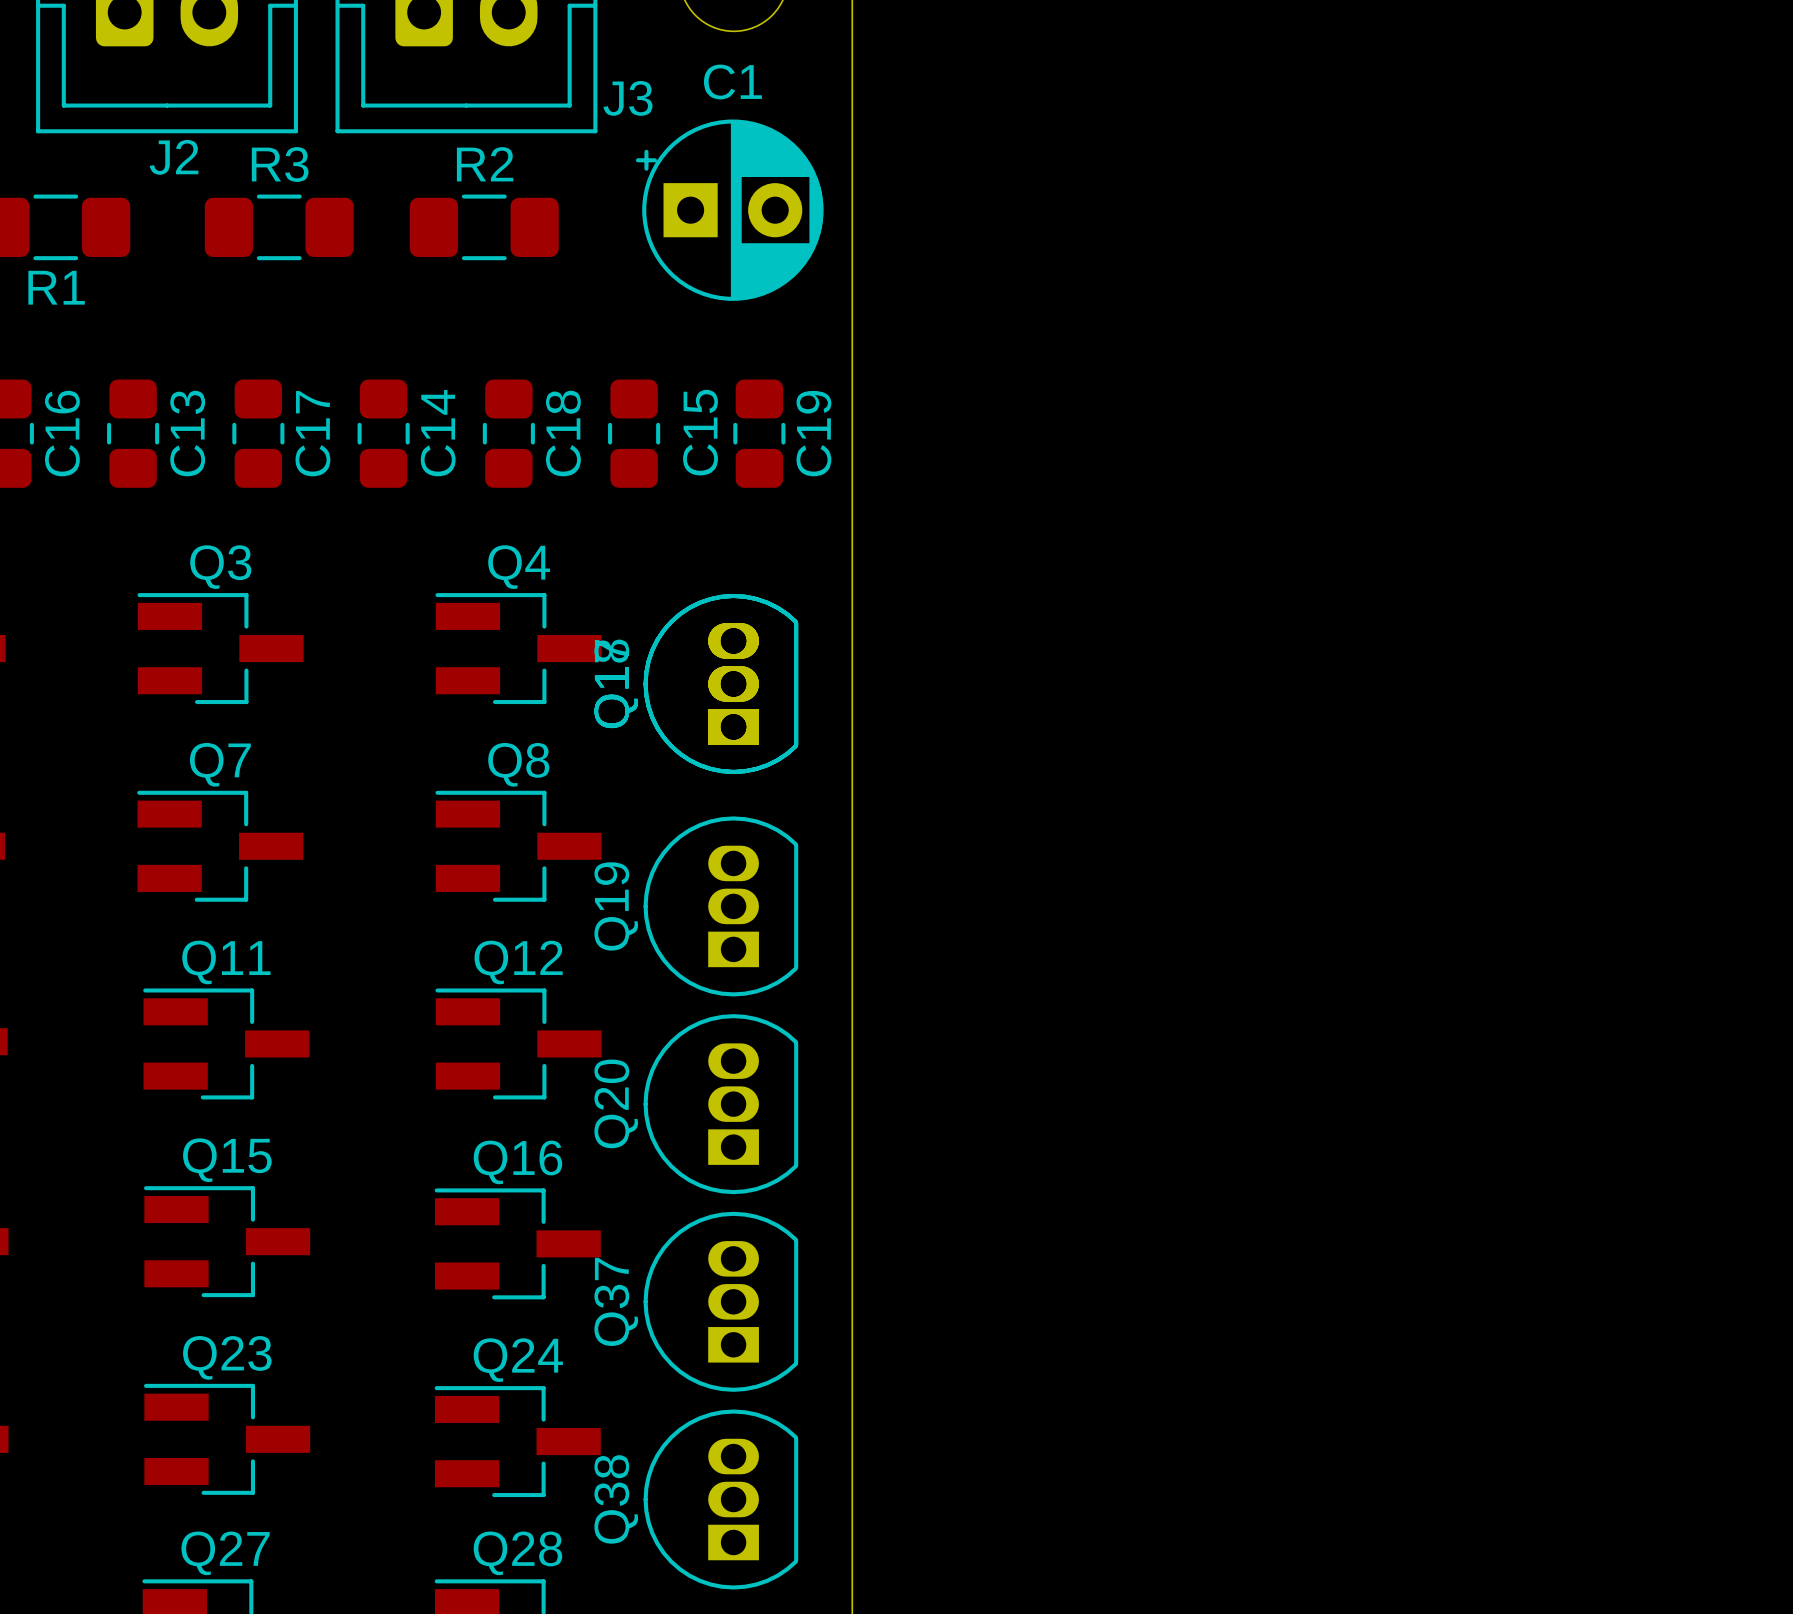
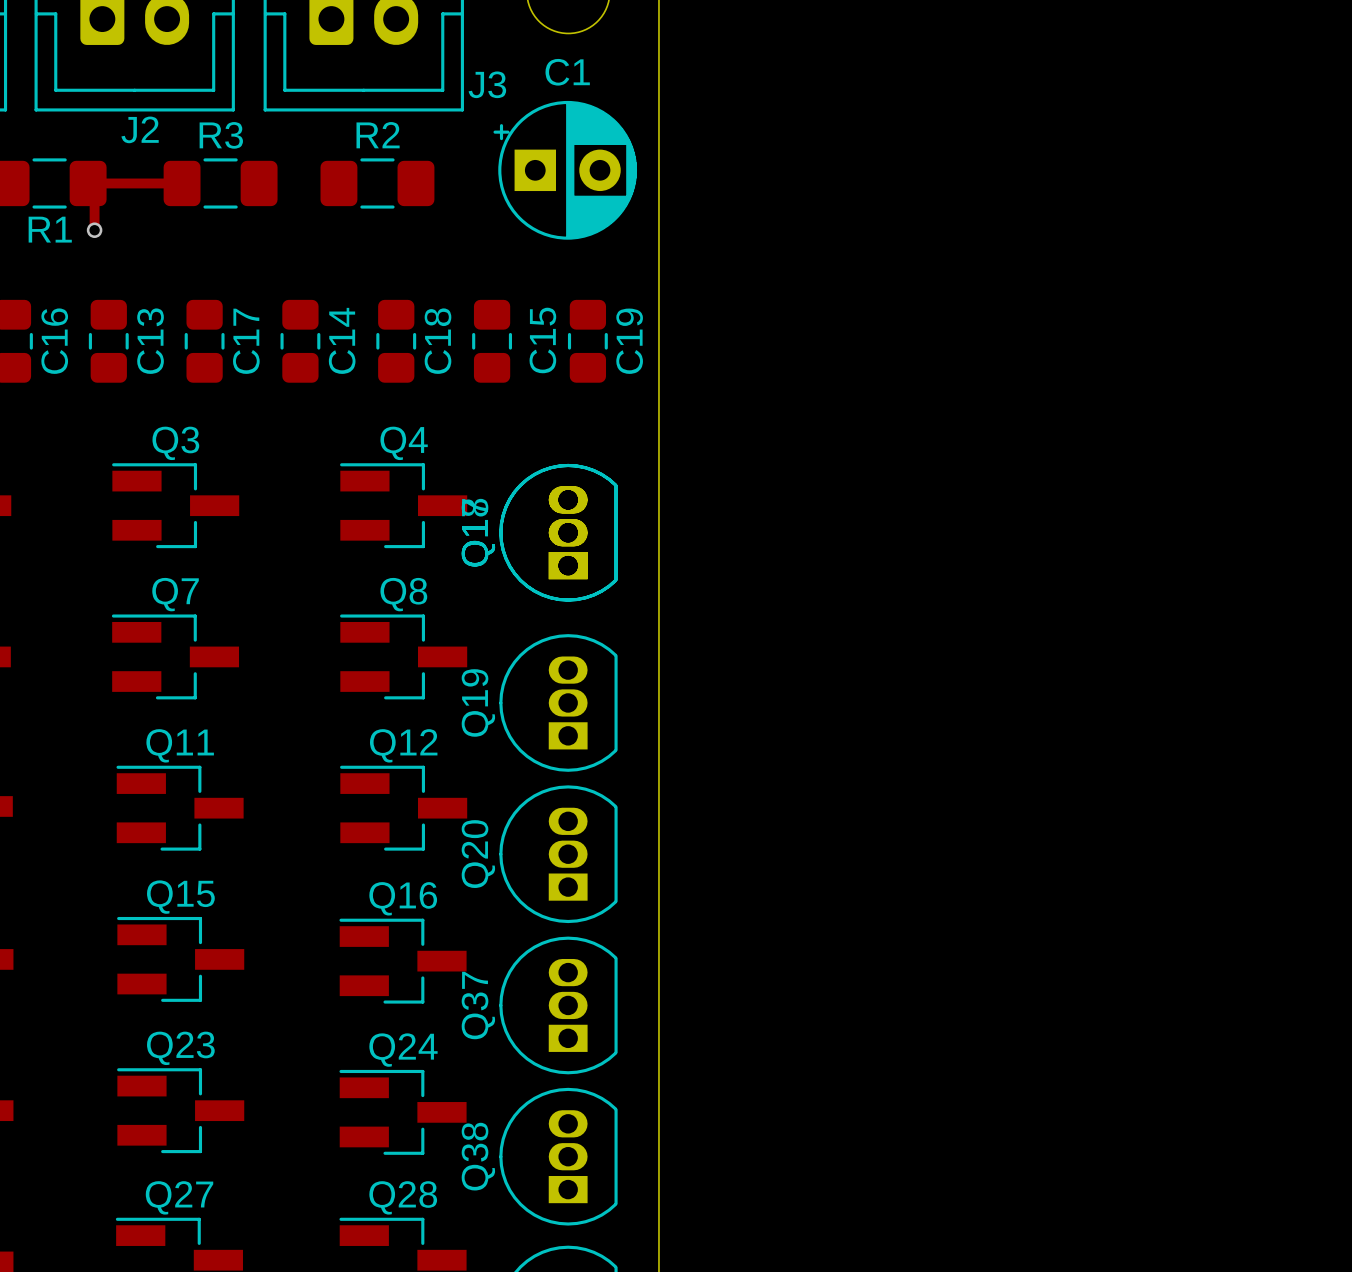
track: none -> (182, 183) (88, 183) (94, 189) (94, 230)
via: none -> (94, 230)

